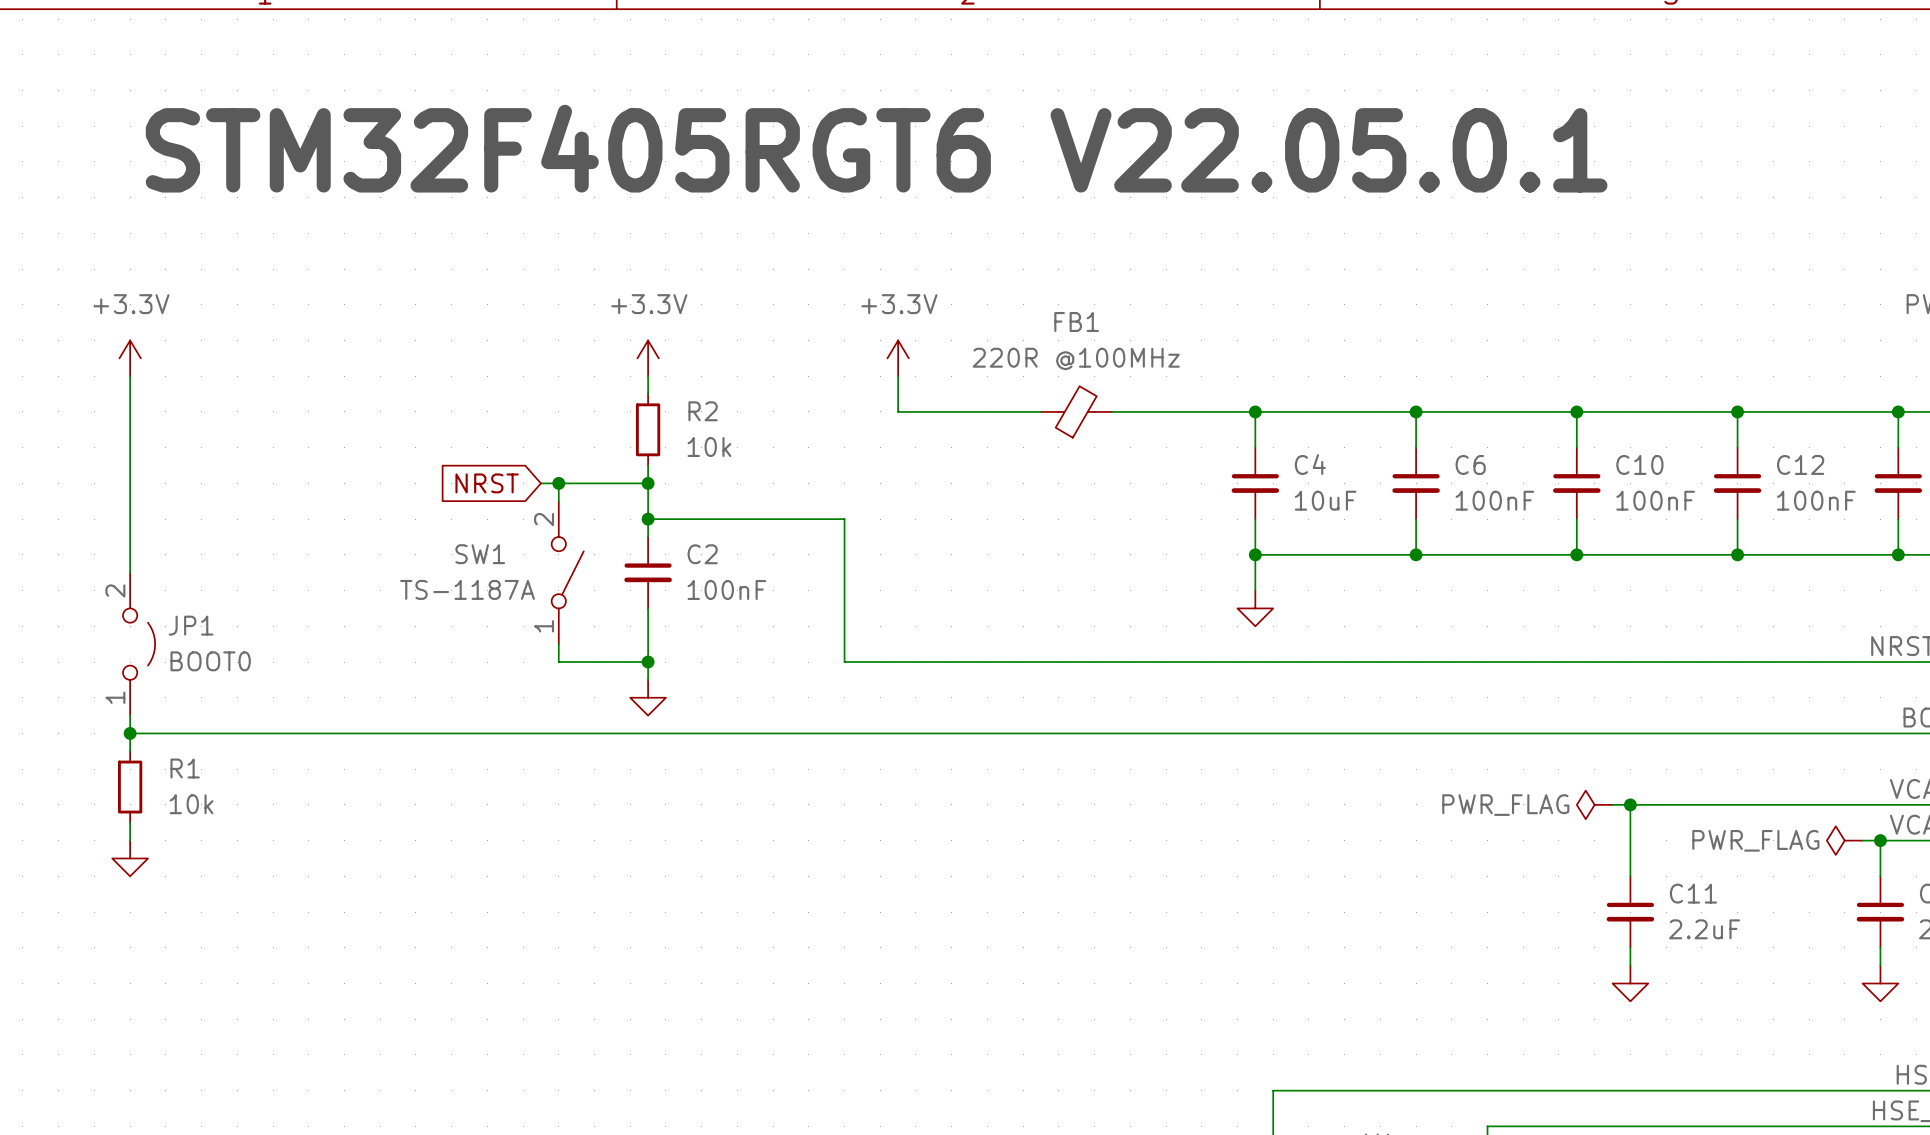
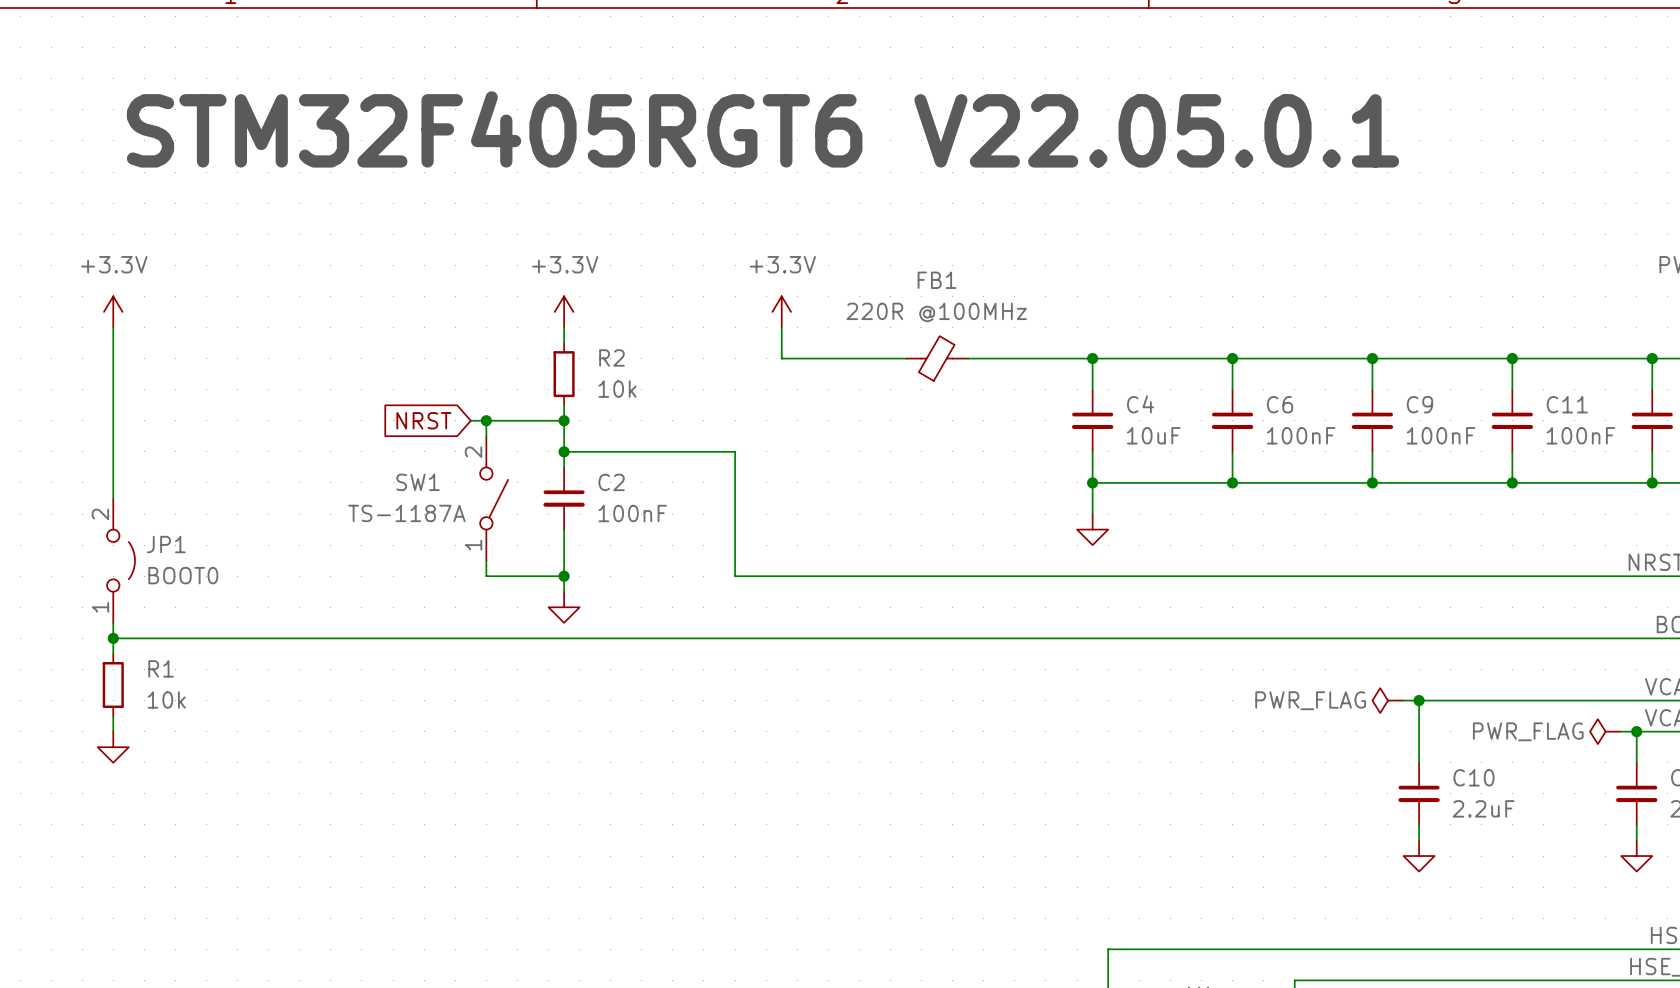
C10 name: C10 (1639, 464) -> C9 (1419, 404)
C12 name: C12 (1800, 464) -> C11 (1567, 404)
C11 name: C11 (1693, 893) -> C10 (1473, 777)

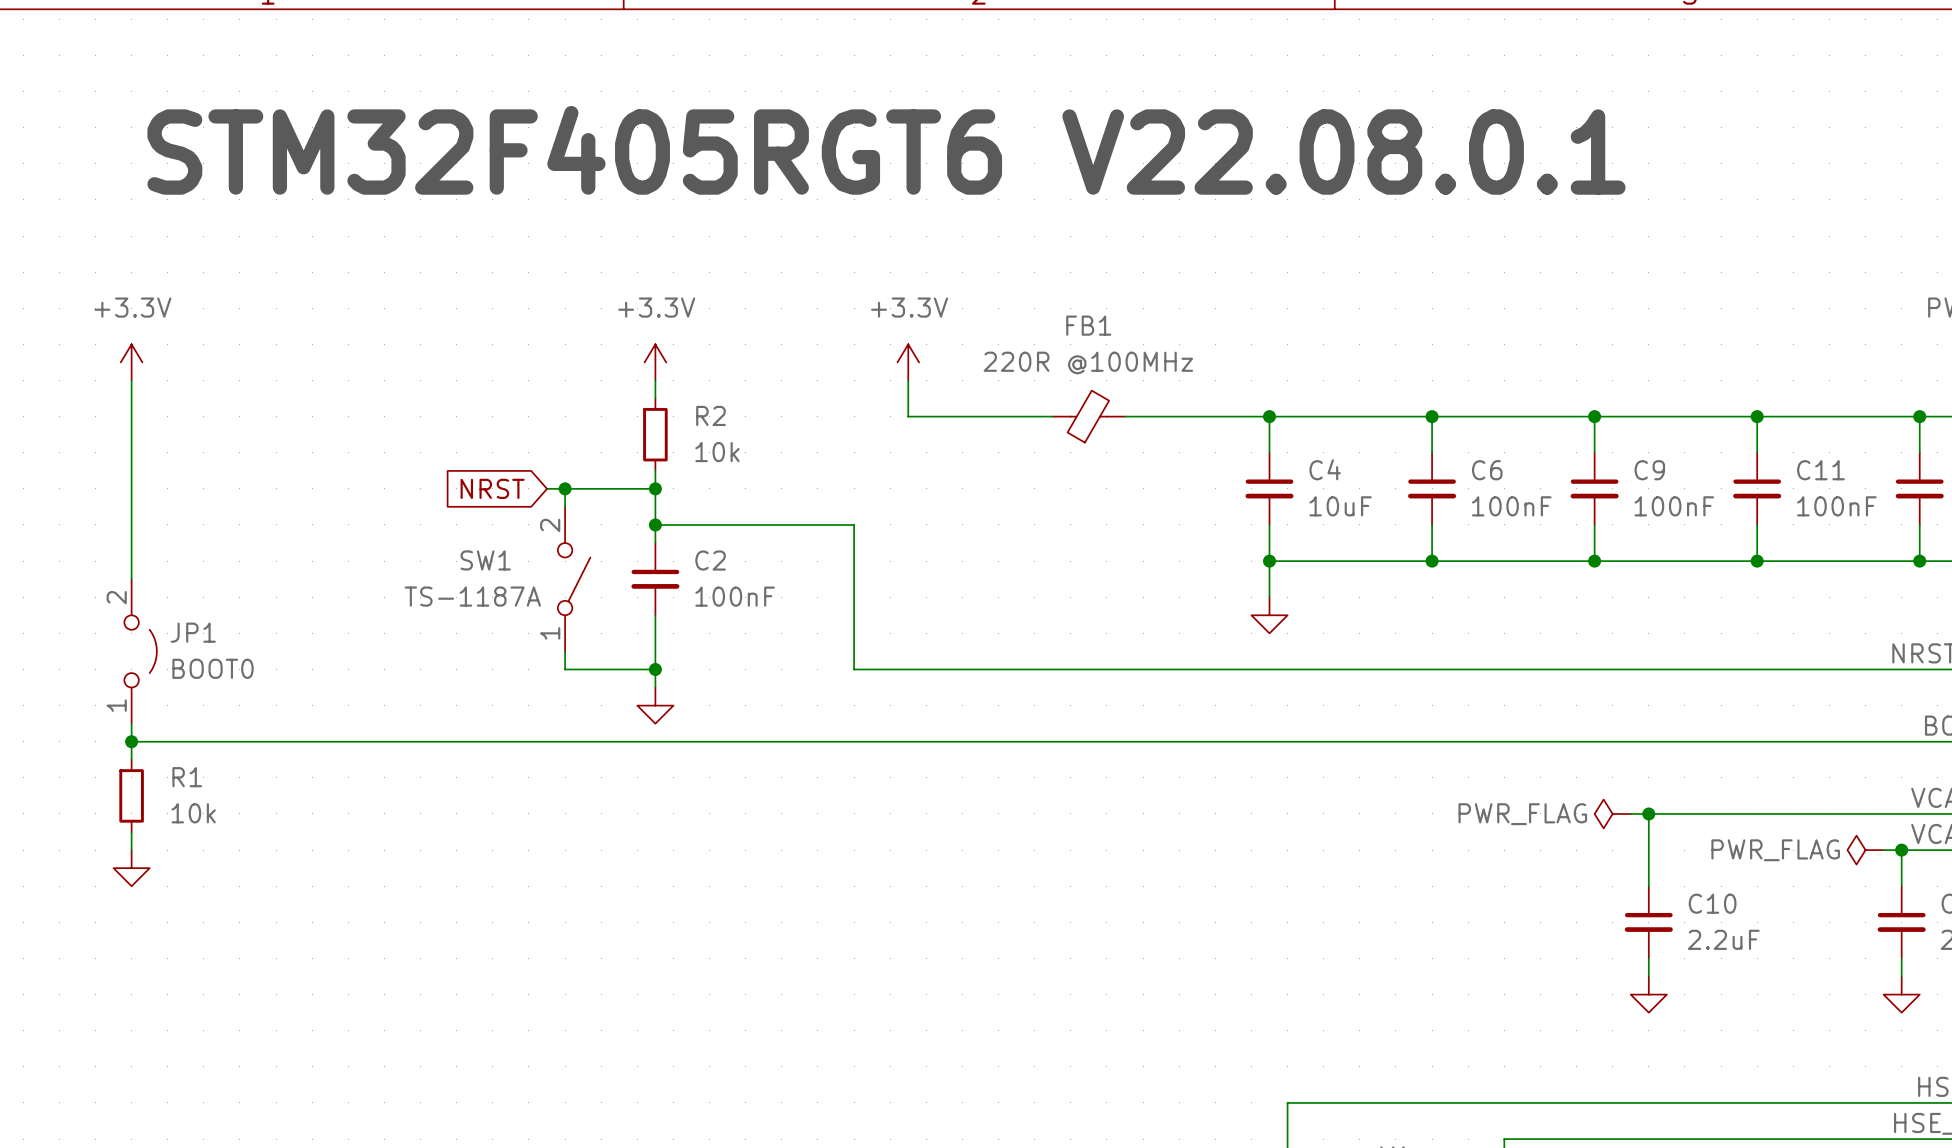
text: STM32F405RGT6 V22.05.0.1 (762, 129) -> STM32F405RGT6 V22.08.0.1 (886, 150)

